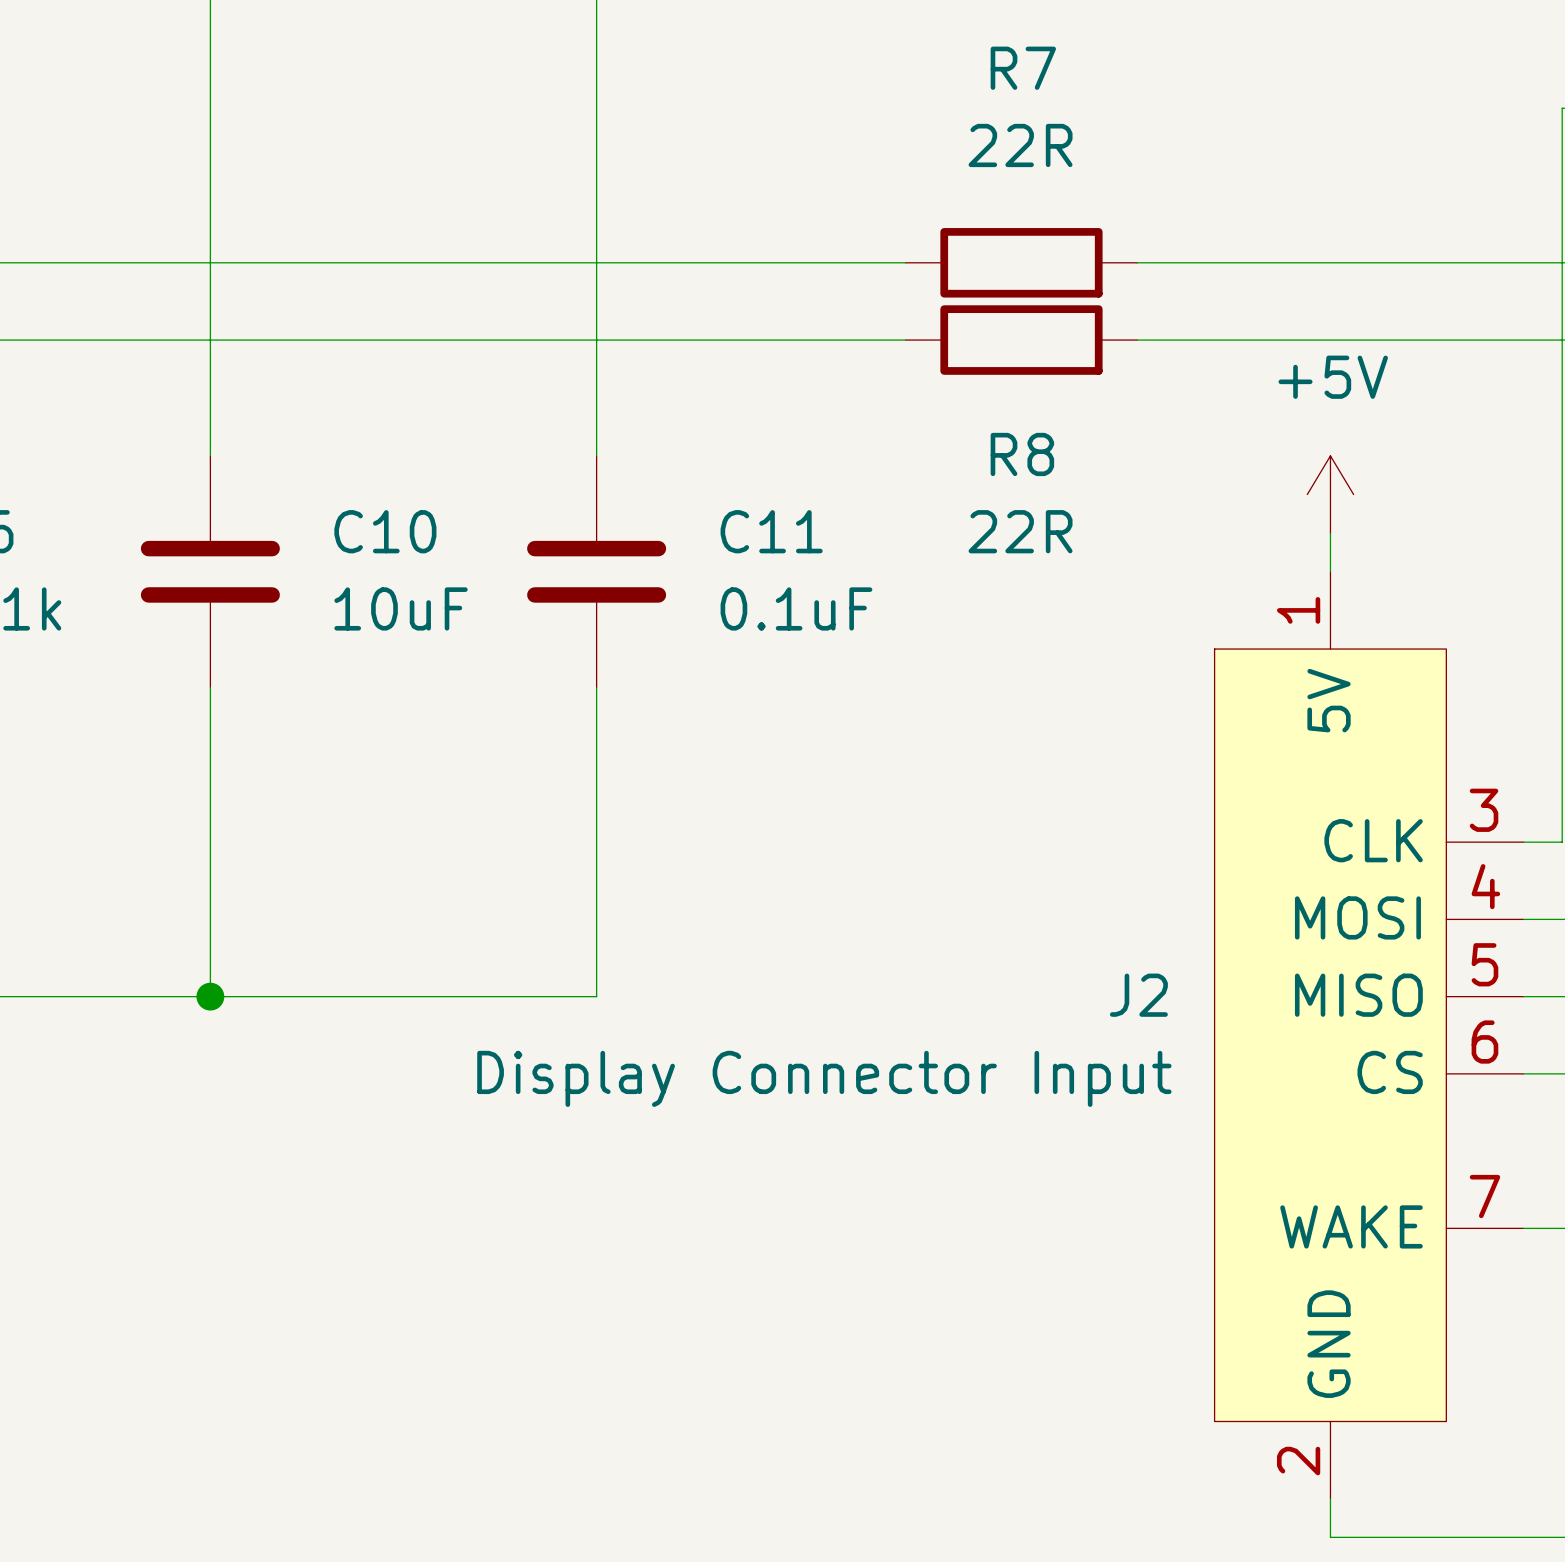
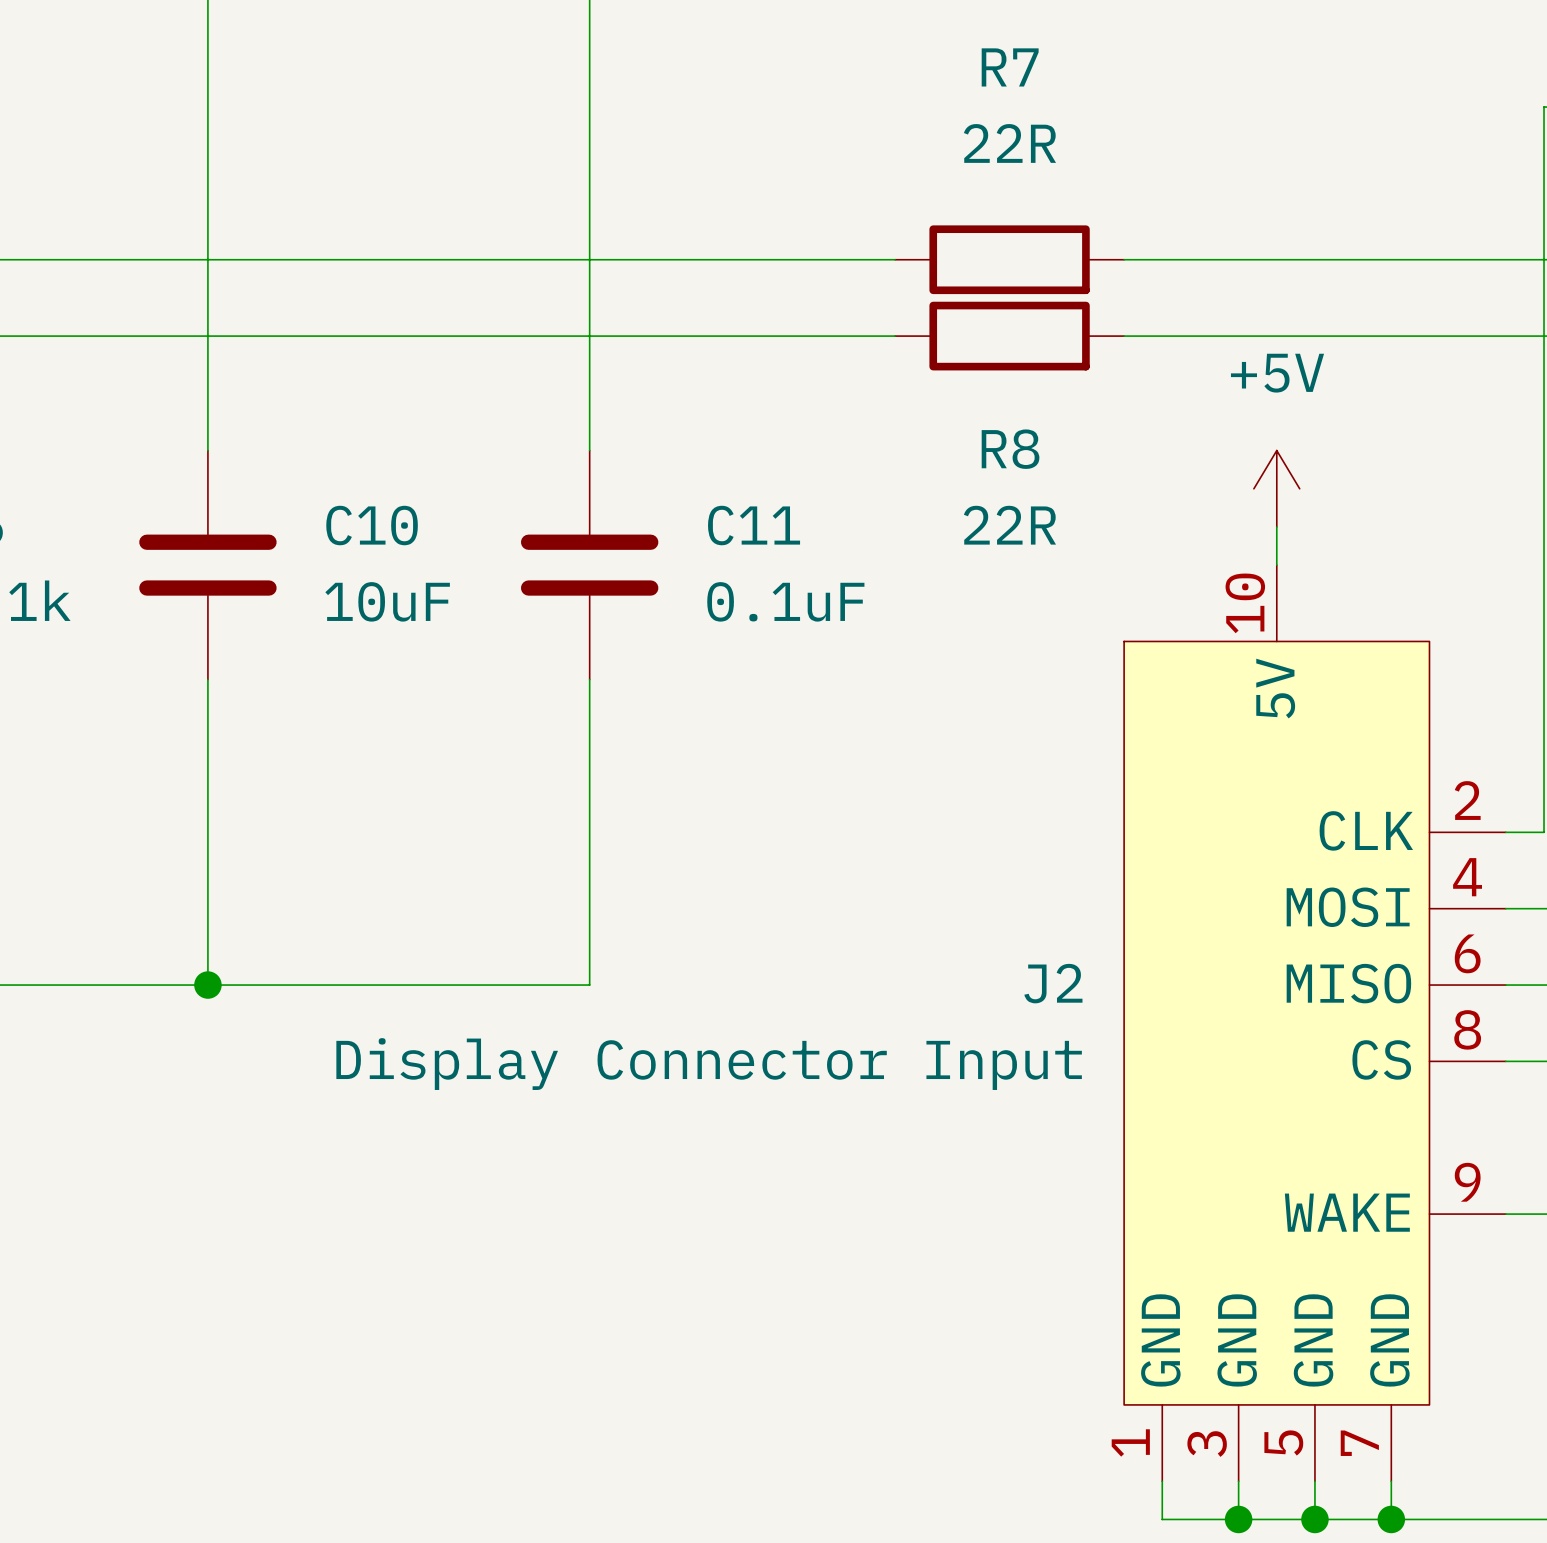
power symbol position: +5V (1330, 494) -> +5V (1276, 488)
wire: (1330, 533) (1330, 571) -> (1276, 526) (1276, 565)
J2 symbol: [1214, 571, 1524, 1499] -> [1124, 565, 1506, 1482]
wire: none -> (1162, 1481) (1162, 1519) (1314, 1519)
wire: none -> (1238, 1481) (1238, 1519)
wire: none -> (1391, 1481) (1391, 1519)
junction: none -> (1238, 1519)
junction: none -> (1314, 1519)
junction: none -> (1391, 1519)

